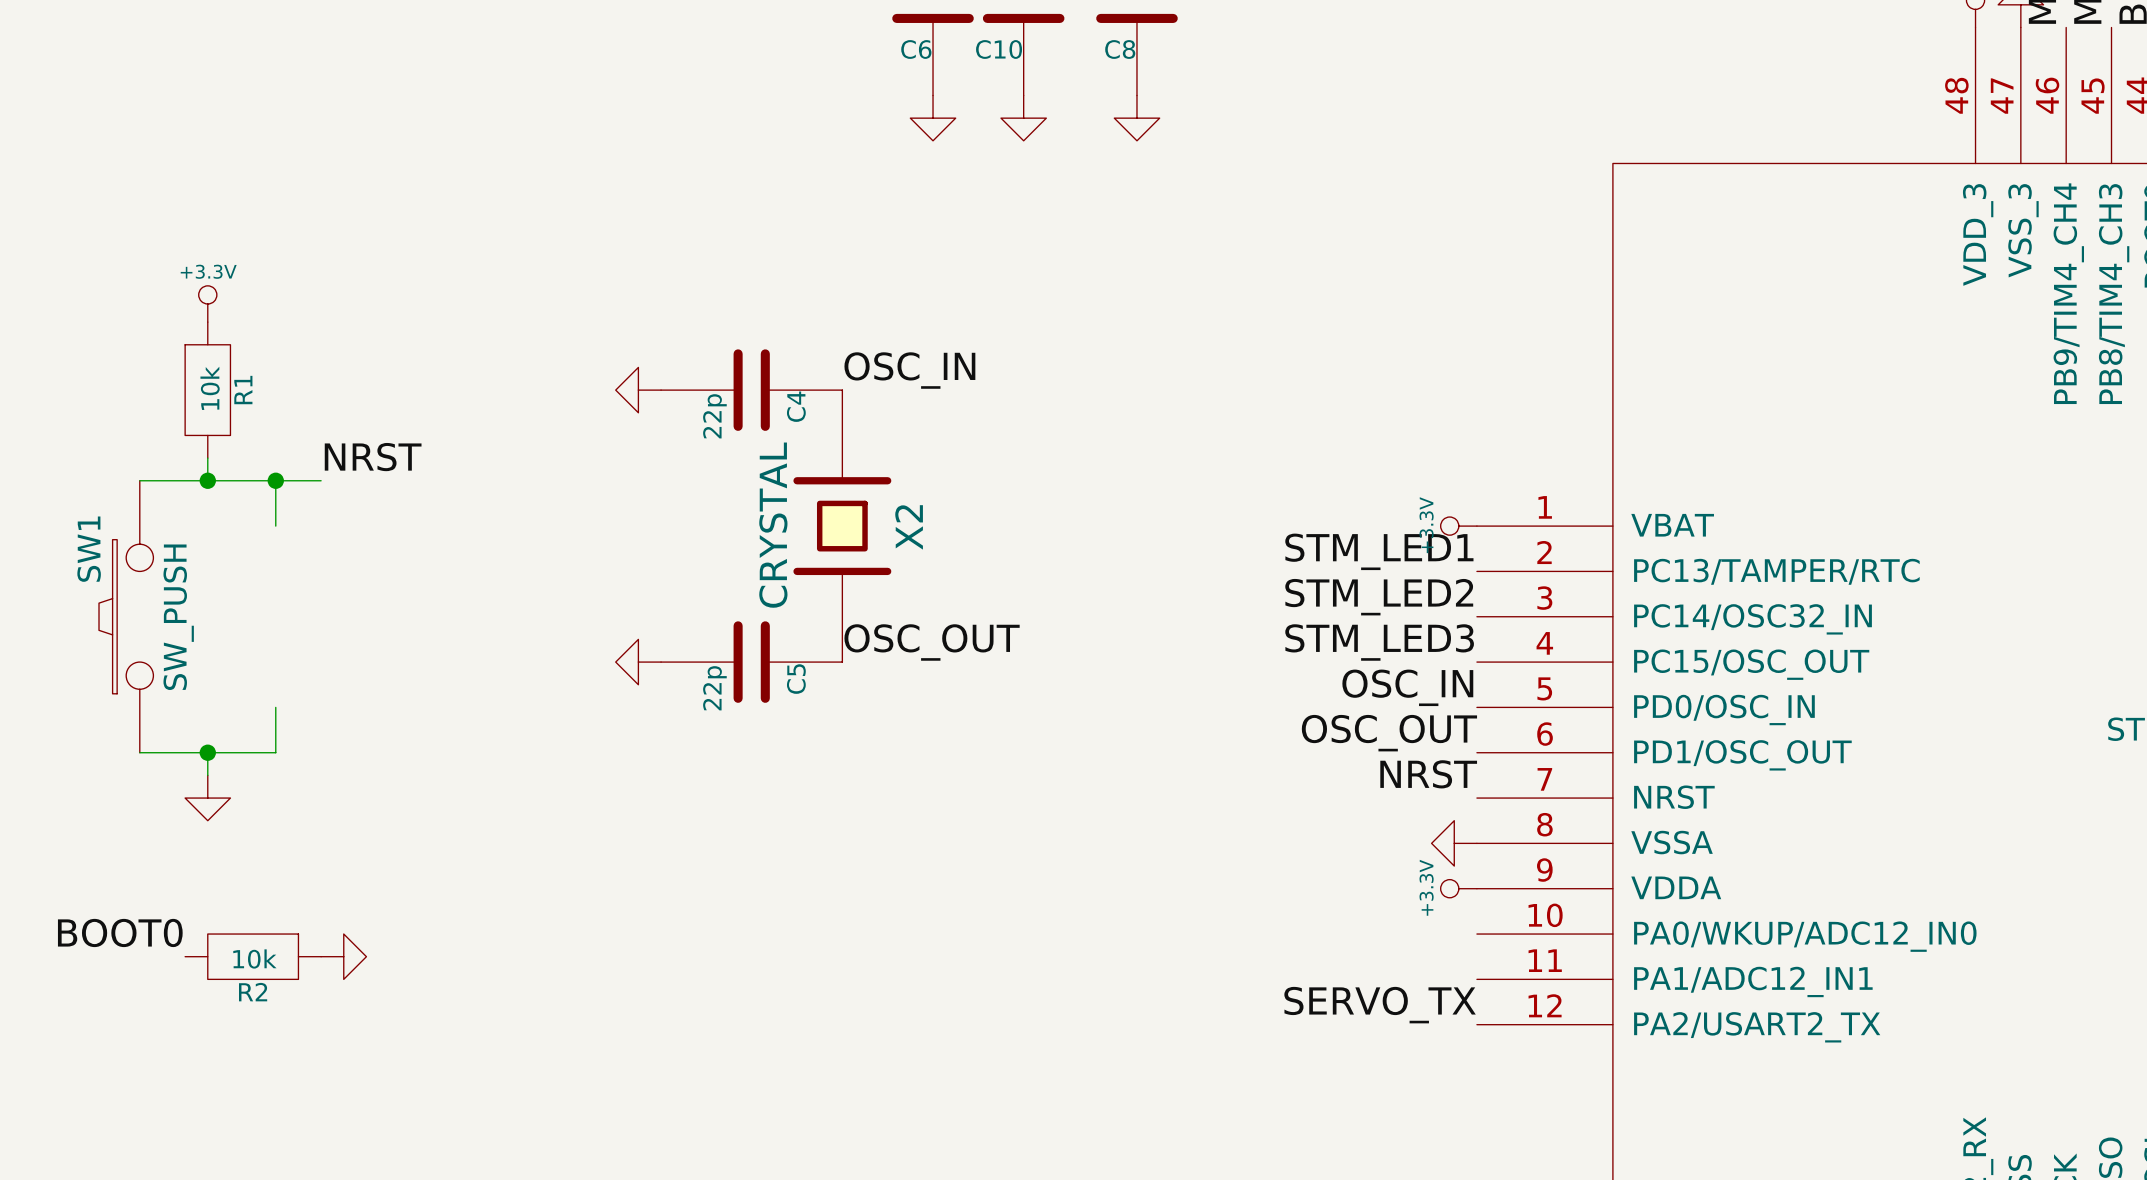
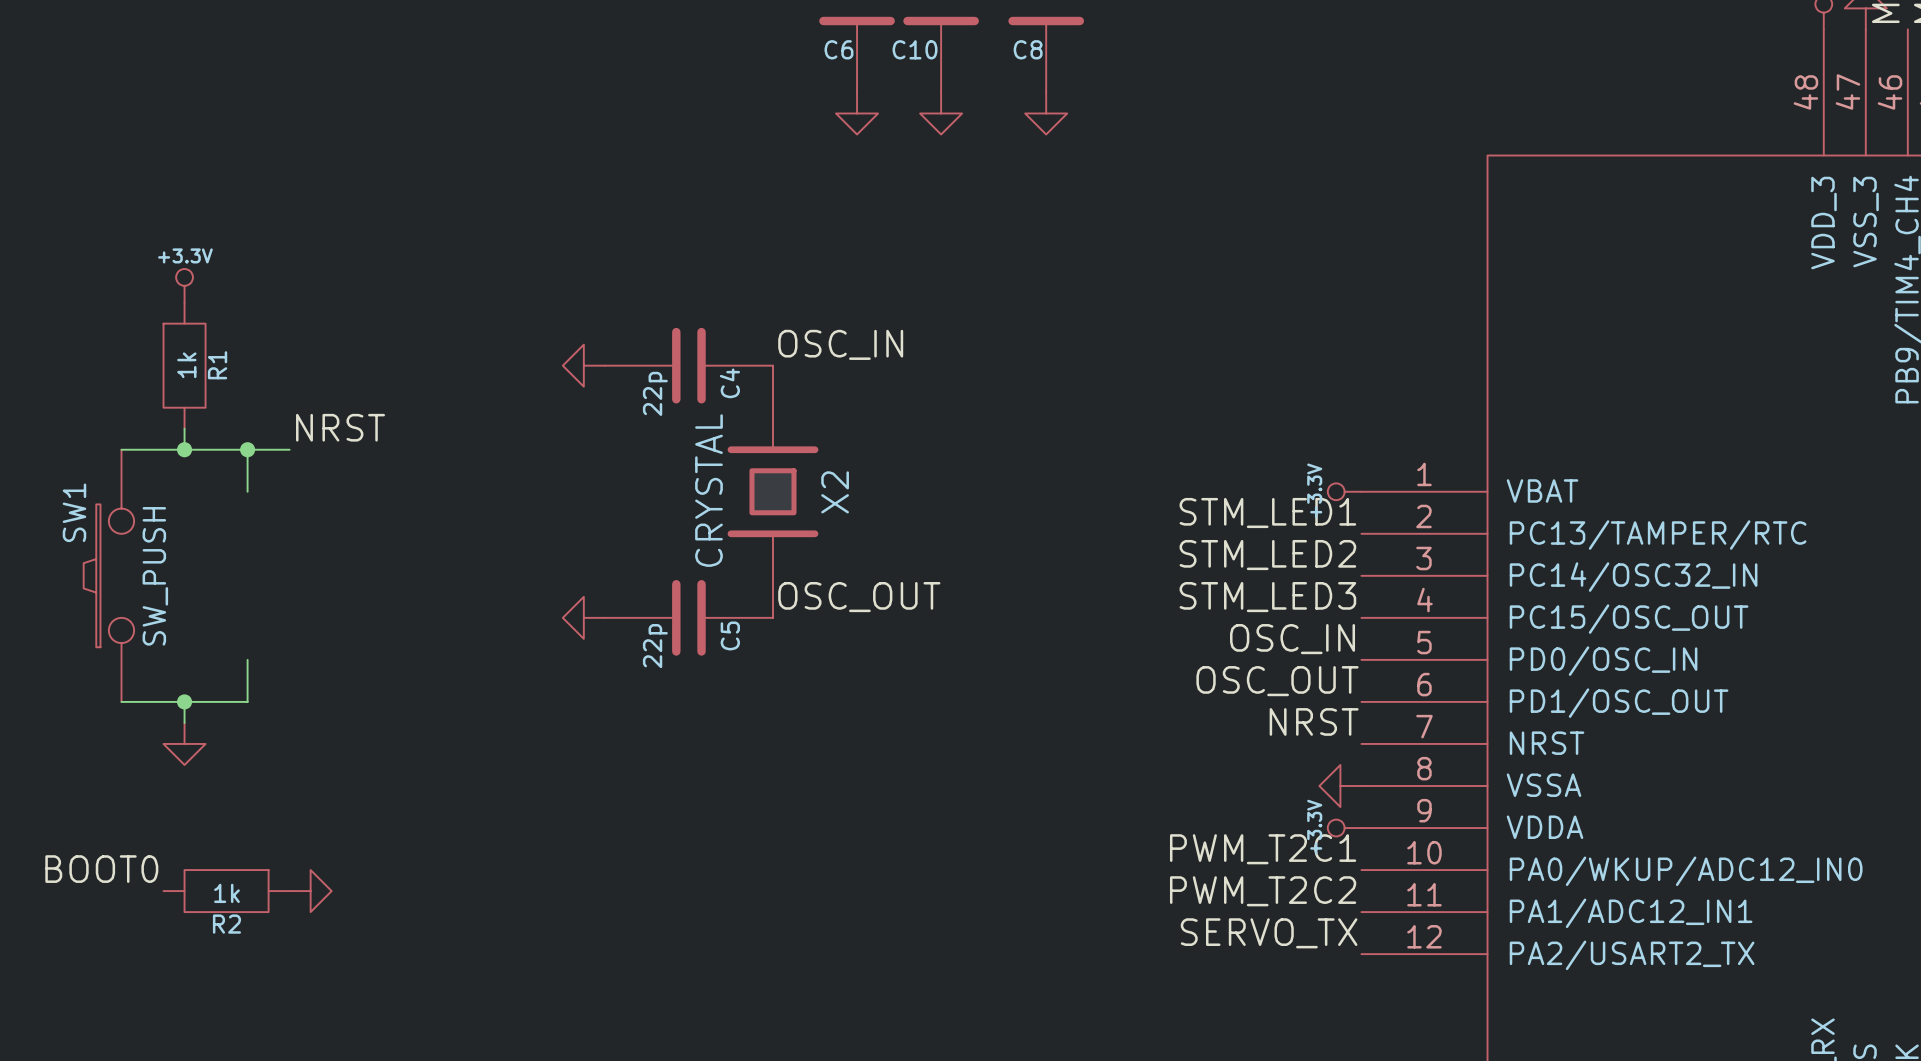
R1 value: 10k (210, 388) -> 1k (186, 365)
label: none -> PWM_T2C1 (1263, 849)
R2 value: 10k (254, 958) -> 1k (226, 893)
label: none -> PWM_T2C2 (1263, 891)

